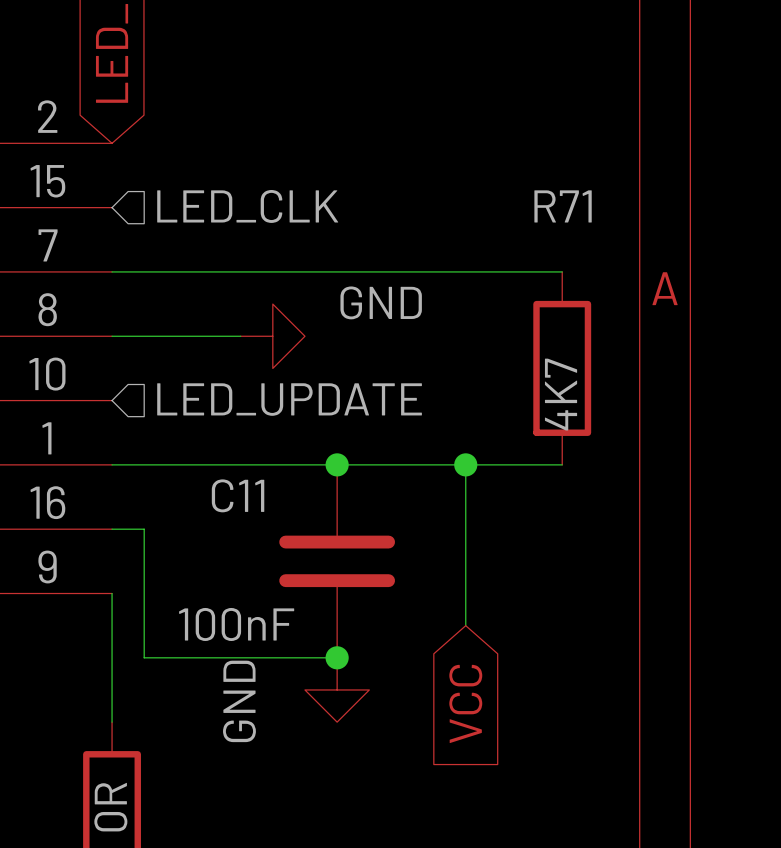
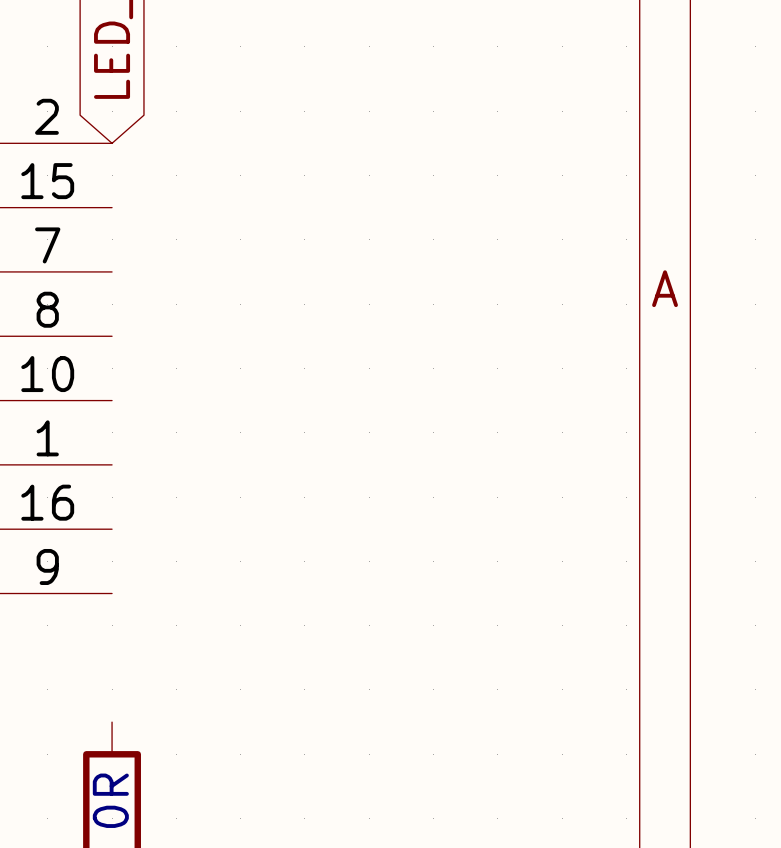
hierarchical label: LED_CLK (247, 206) -> none
wire: (112, 271) (562, 271) -> none
wire: (112, 336) (240, 336) -> none
power symbol: GND (272, 336) -> none
R71: 4K7 (562, 368) -> none
hierarchical label: LED_UPDATE (289, 399) -> none
wire: (112, 464) (562, 464) -> none
junction: (337, 464) -> none
wire: (465, 464) (465, 625) -> none
junction: (465, 464) -> none
wire: (112, 529) (144, 529) (144, 657) (337, 657) -> none
C11: 100nF (337, 561) -> none
wire: (112, 593) (112, 722) -> none
junction: (337, 657) -> none
power symbol: GND (337, 689) -> none
global label: VCC (465, 703) -> none

